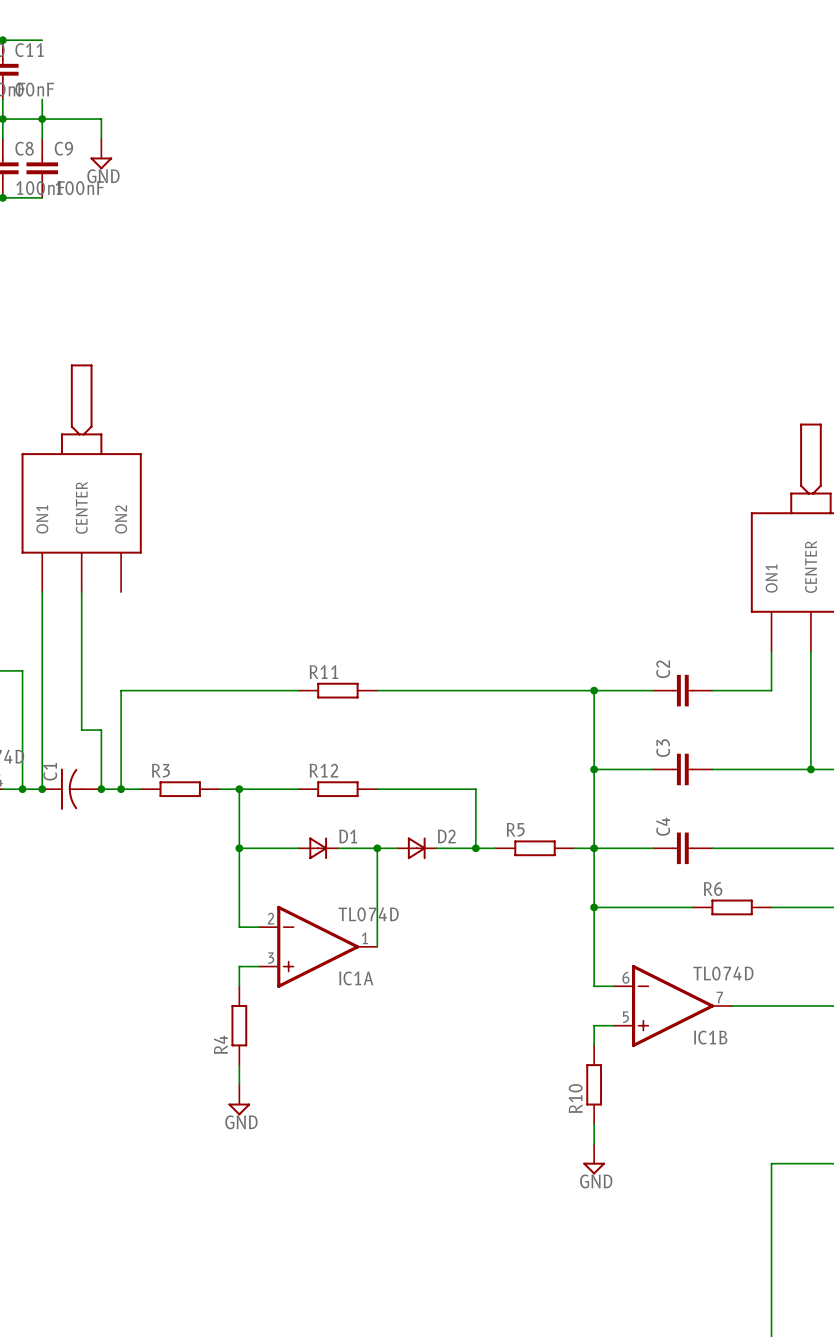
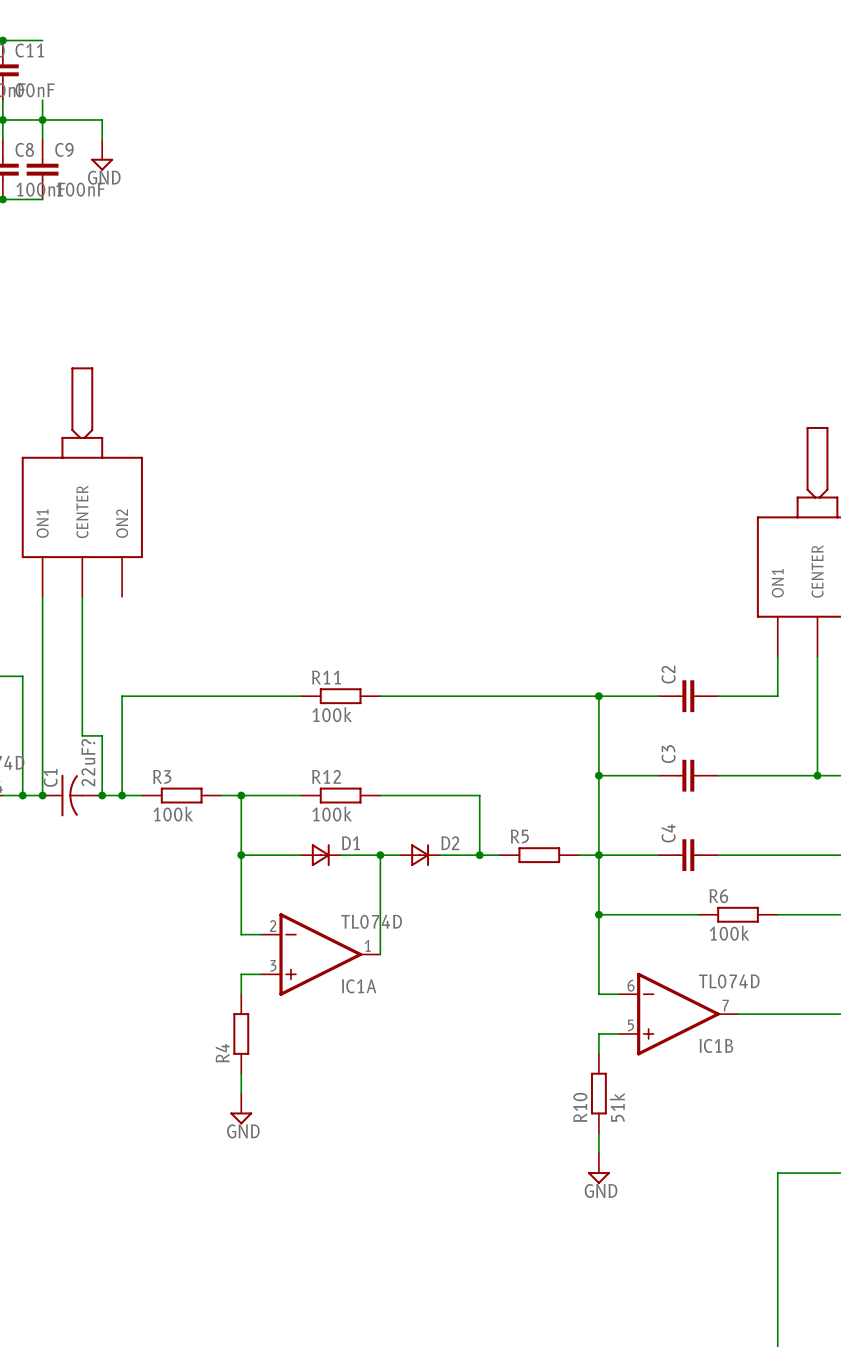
R11 value: none -> 100k (332, 714)
C1 value: none -> 22uF? (88, 762)
R3 value: none -> 100k (173, 814)
R12 value: none -> 100k (332, 814)
R6 value: none -> 100k (729, 933)
R10 value: none -> 51k (617, 1107)

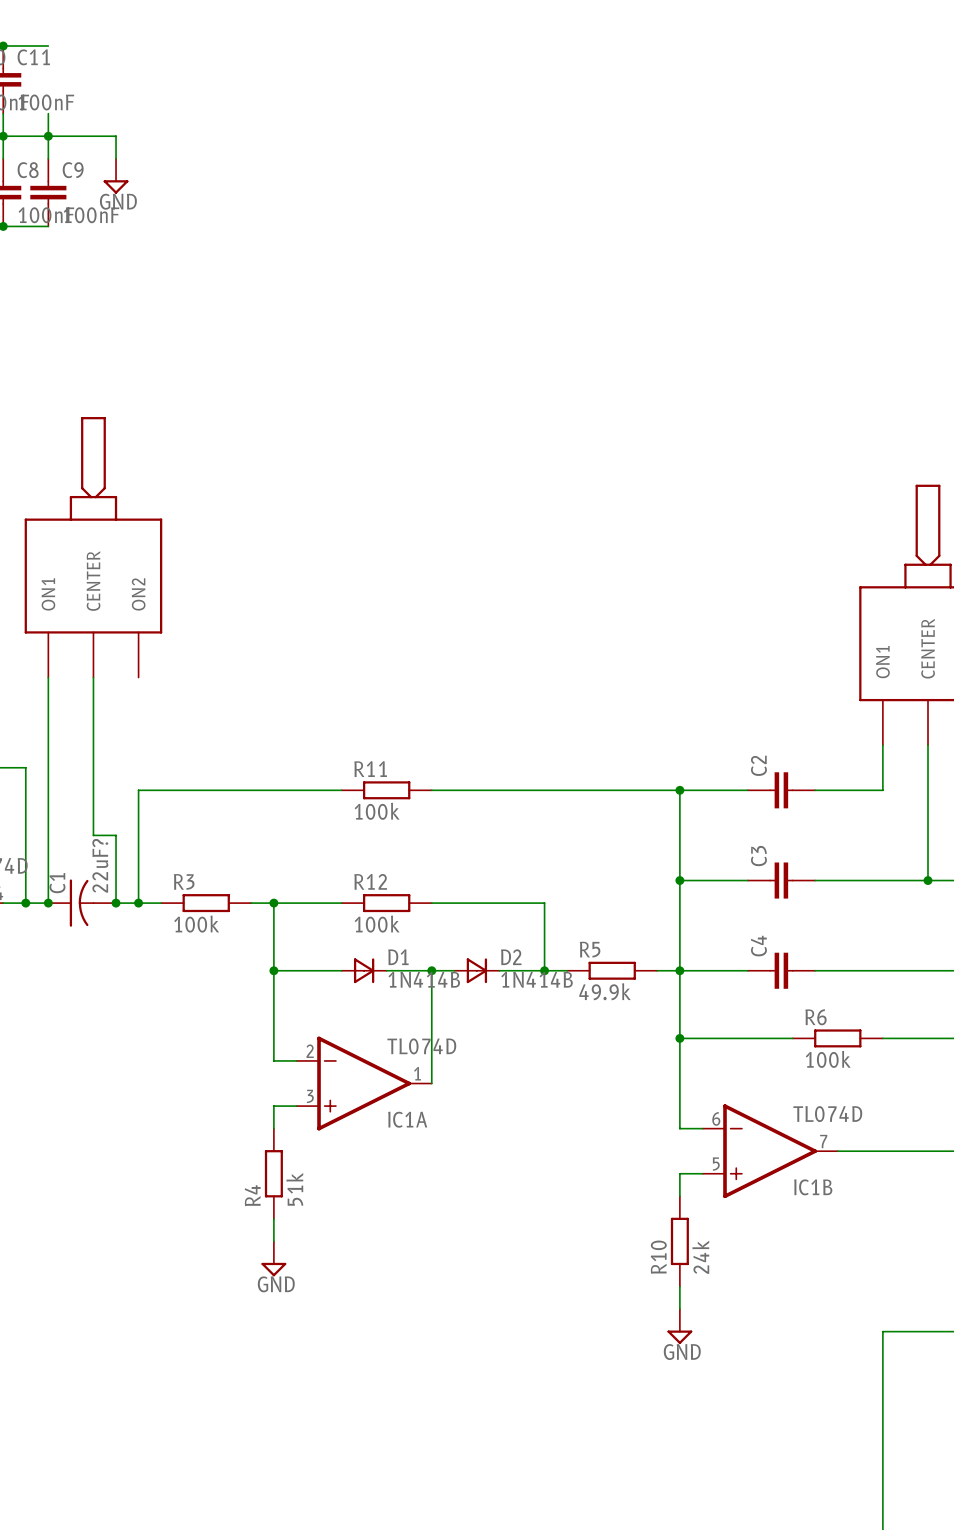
C11 value: 00nF (35, 90) -> 100nF (46, 102)
D1 value: none -> 1N414B (424, 979)
D2 value: none -> 1N414B (537, 979)
R5 value: none -> 49.9k (605, 991)
R4 value: none -> 51k (294, 1189)
R10 value: 51k (617, 1107) -> 24k (700, 1257)

